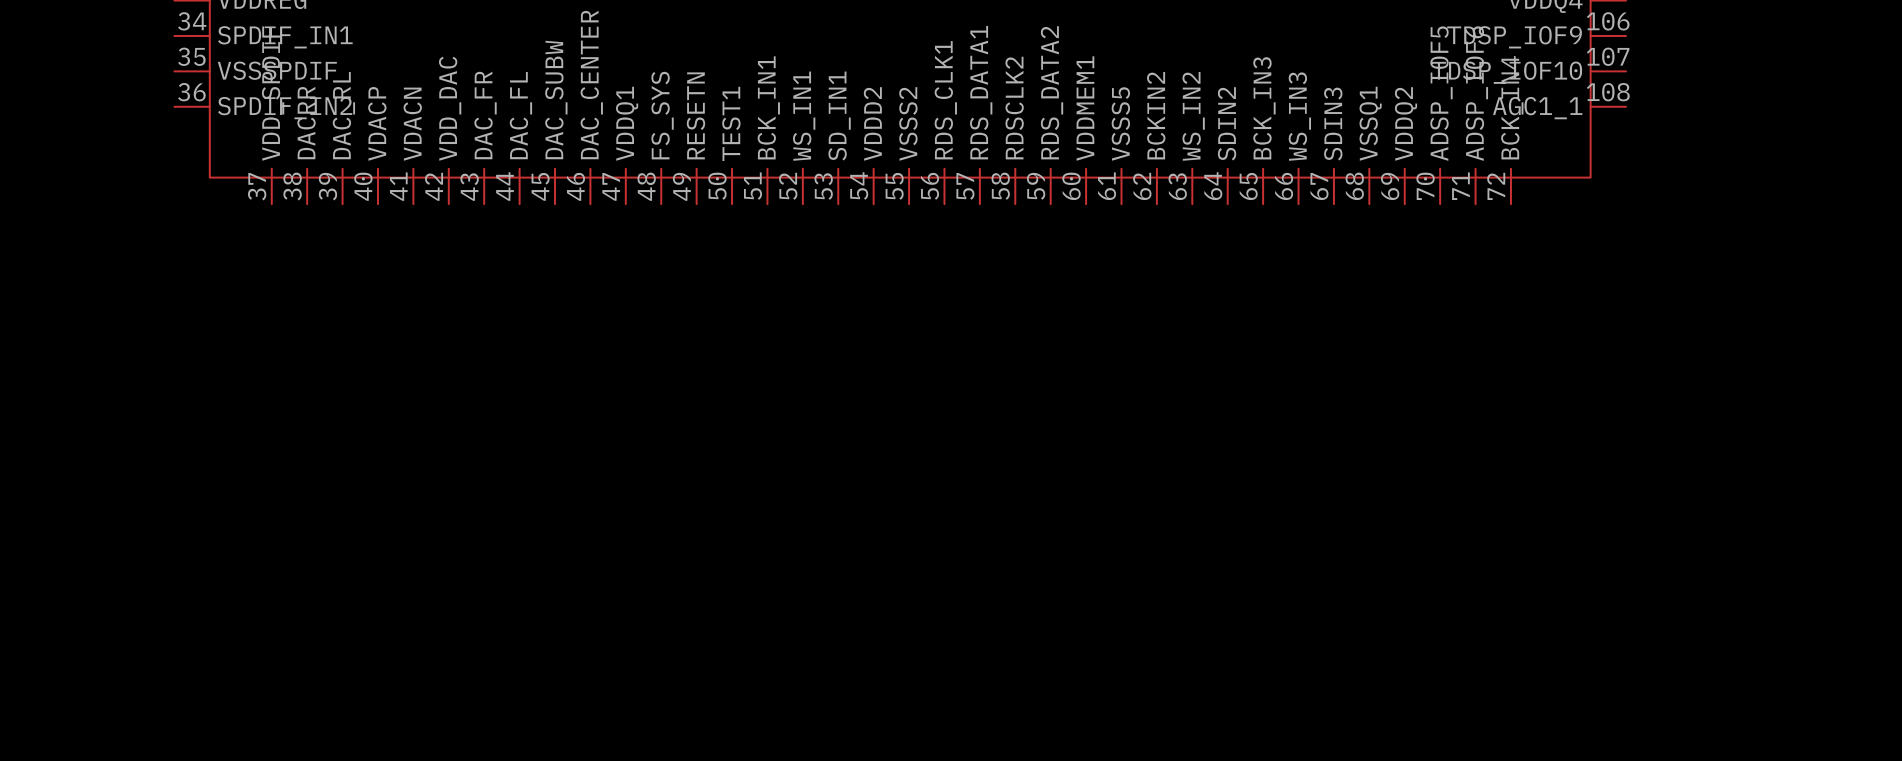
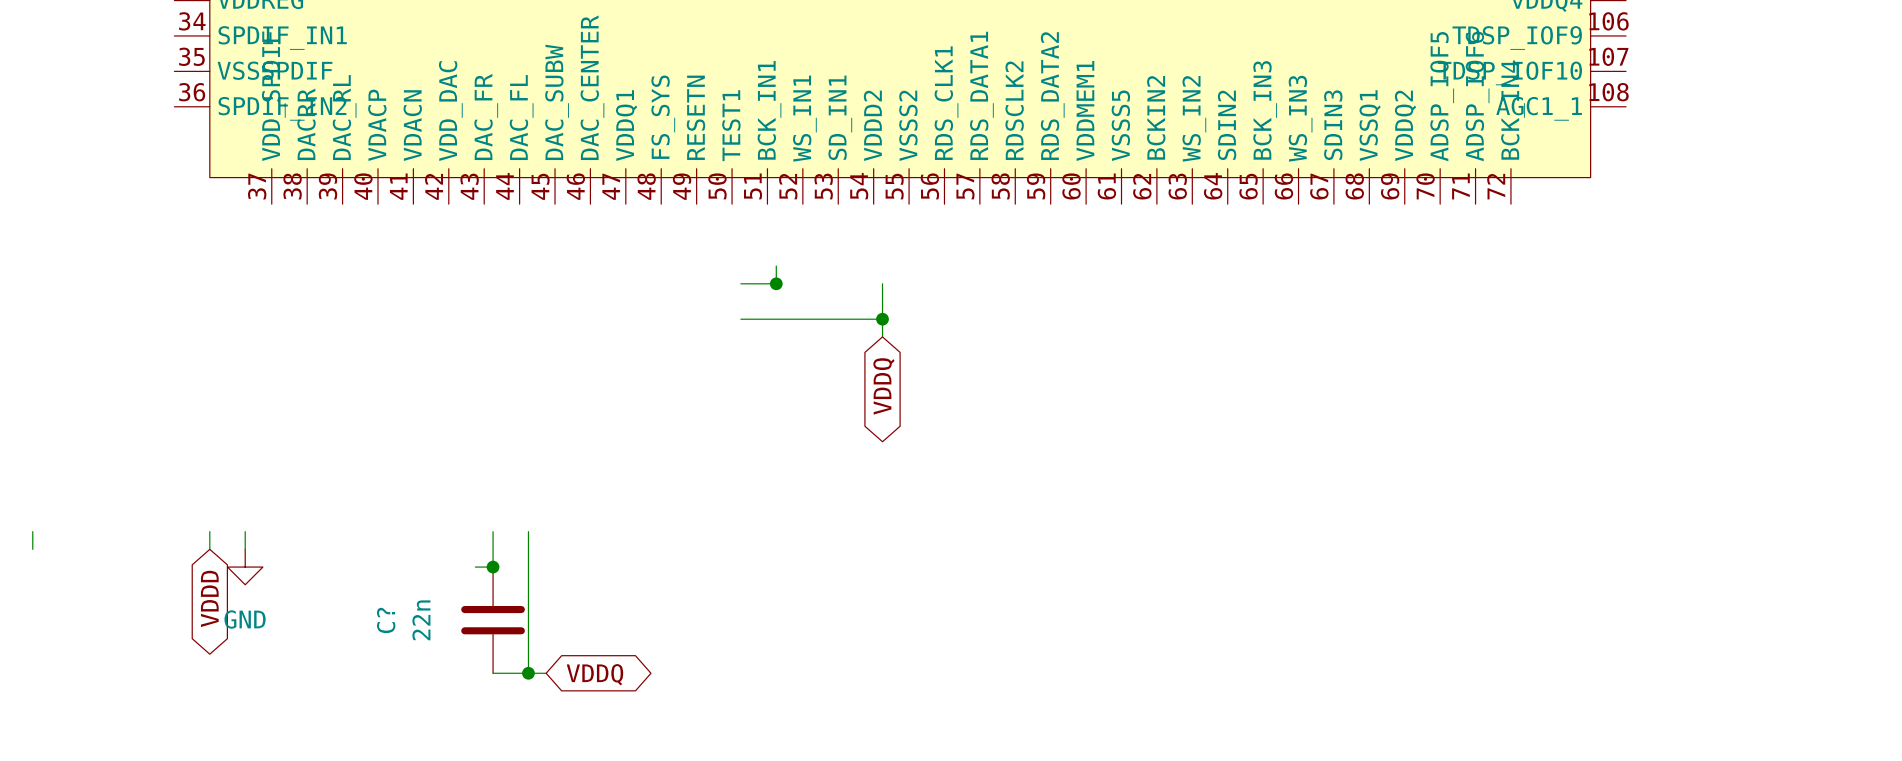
wire: none -> (776, 266) (776, 283) (740, 283)
junction: none -> (776, 283)
wire: none -> (882, 283) (882, 336)
wire: none -> (740, 319) (882, 319)
junction: none -> (882, 319)
global label: none -> VDDQ (883, 386)
wire: none -> (32, 531) (32, 549)
wire: none -> (209, 531) (209, 549)
wire: none -> (245, 531) (245, 549)
wire: none -> (493, 531) (493, 567) (475, 567)
wire: none -> (528, 531) (528, 673)
power symbol: none -> GND (245, 567)
junction: none -> (493, 567)
global label: none -> VDDD (209, 598)
C?: none -> 22n (493, 620)
wire: none -> (493, 673) (546, 673)
junction: none -> (528, 673)
global label: none -> VDDQ (594, 674)

